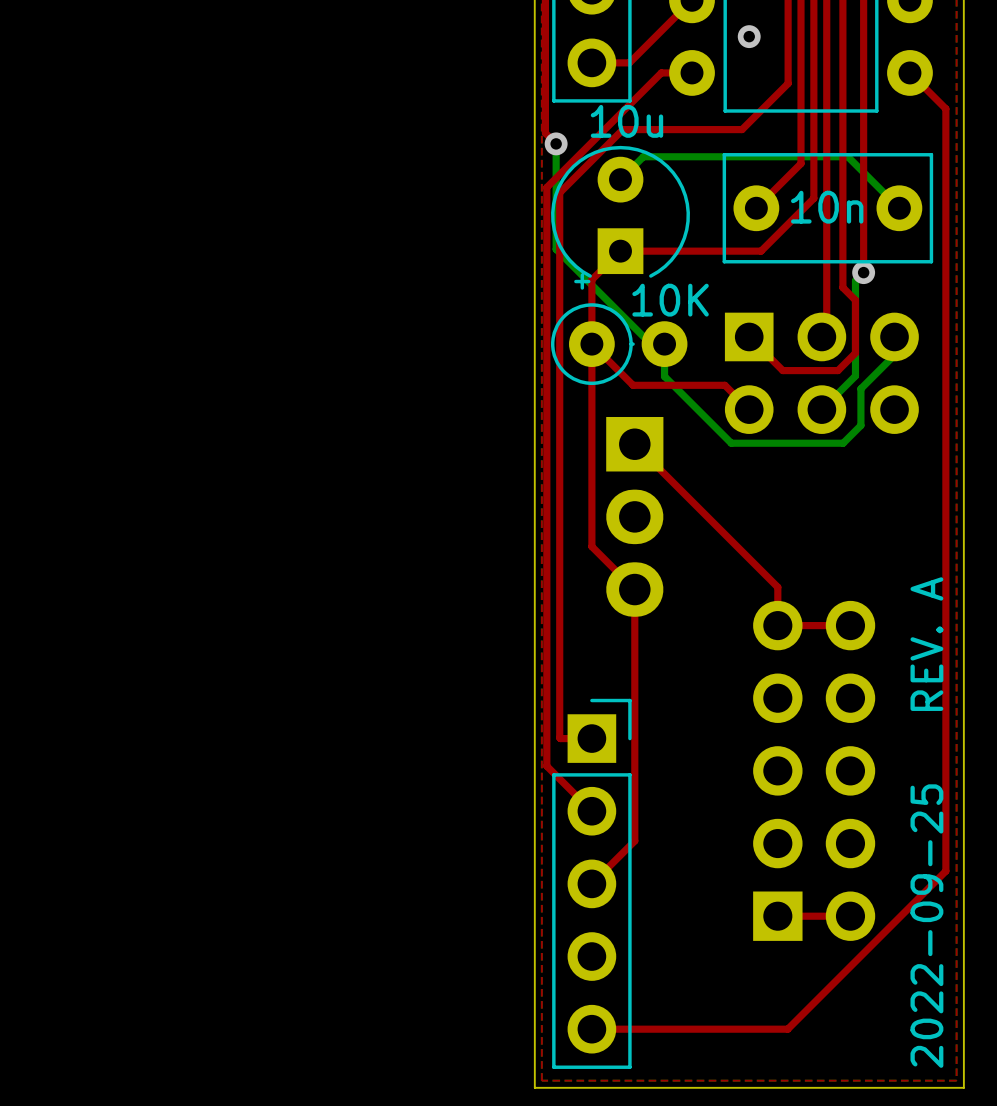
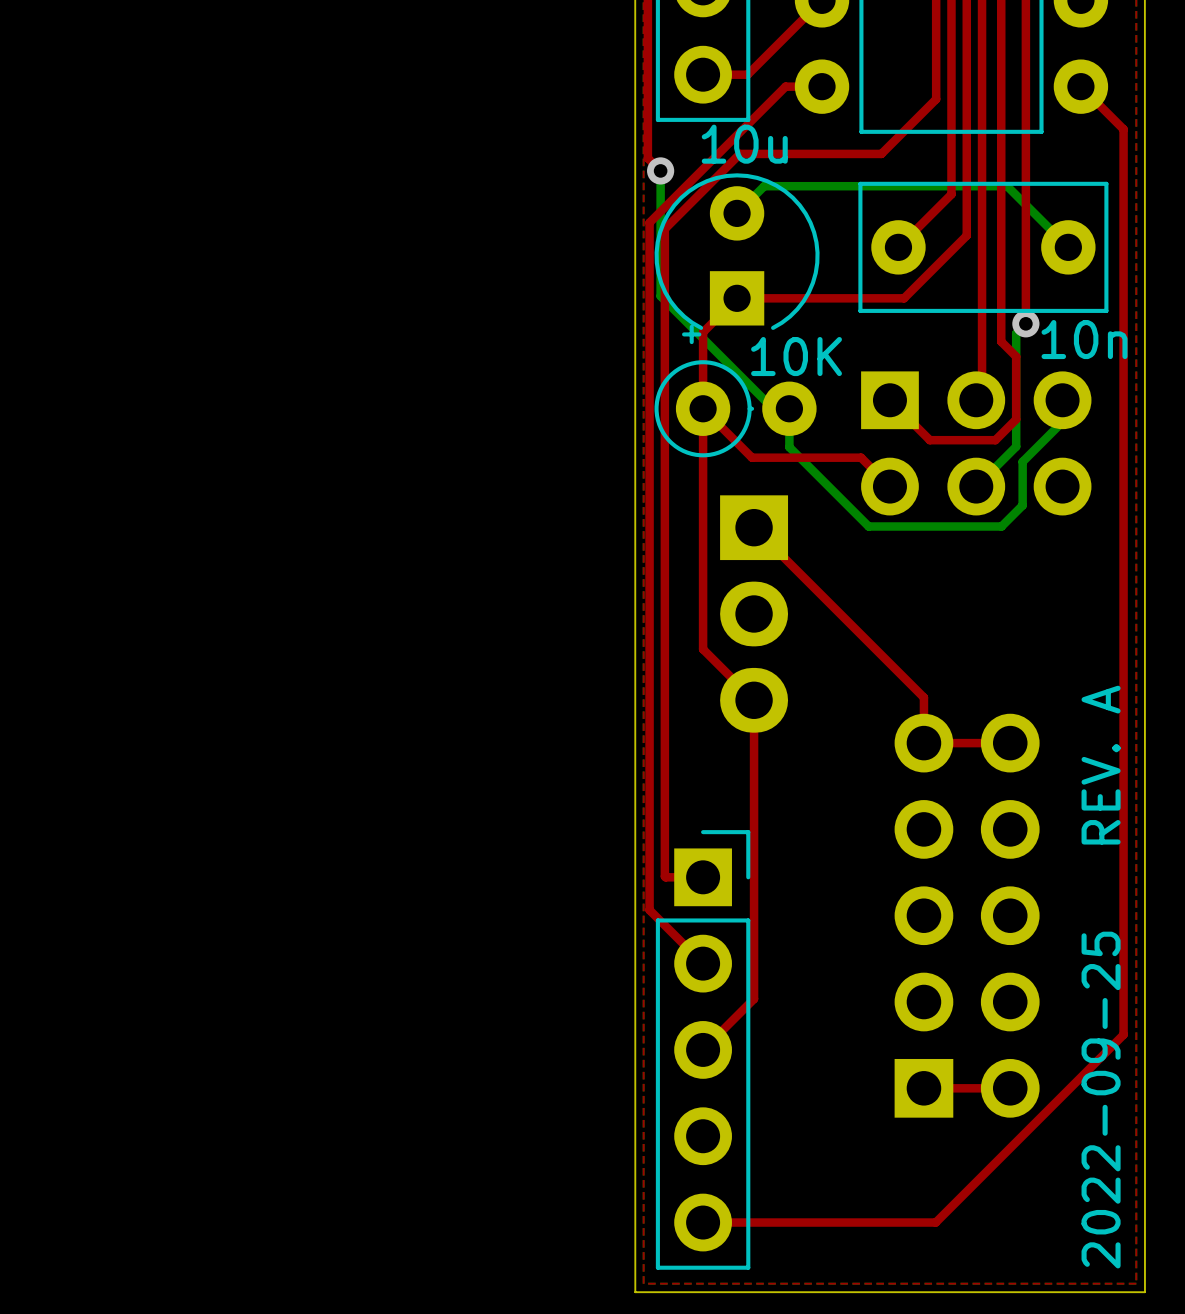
via: (749, 36) -> none
part value position: 10n (827, 207) -> 10n (1084, 339)

